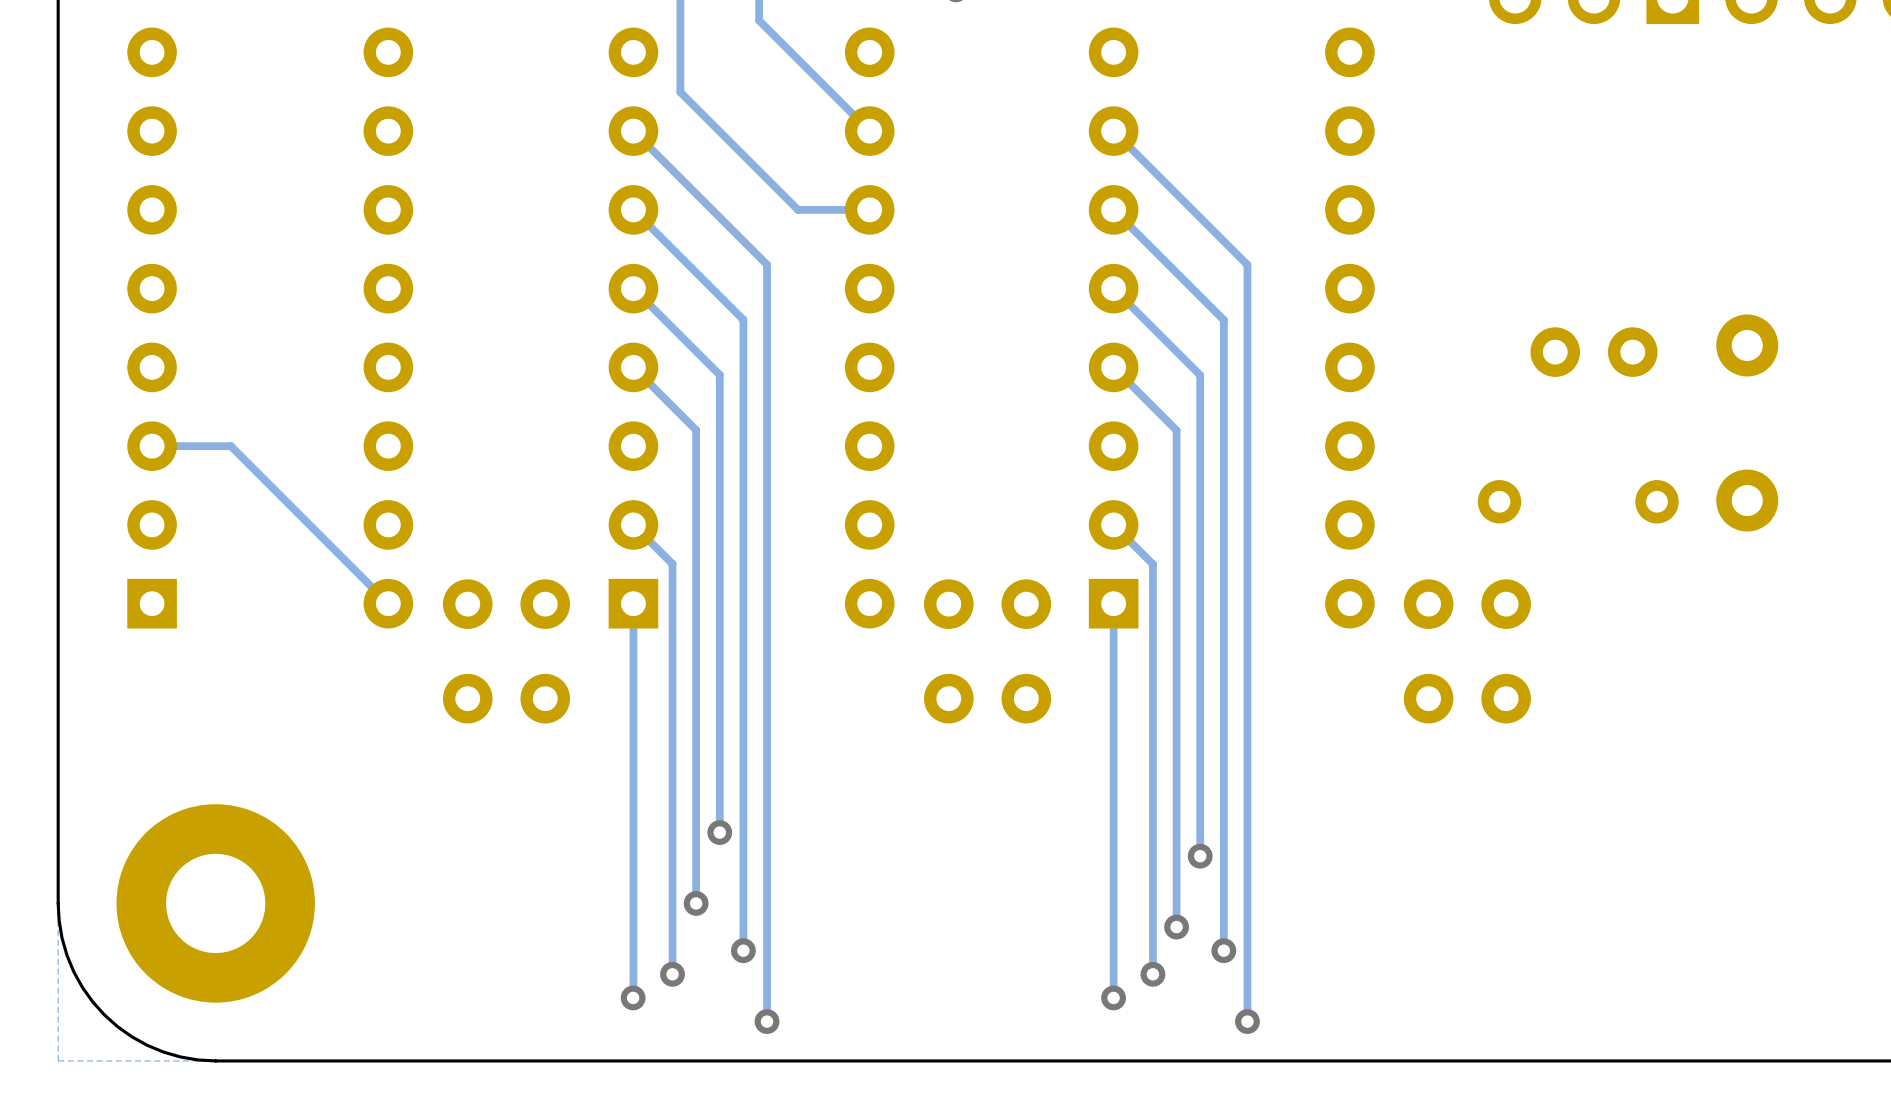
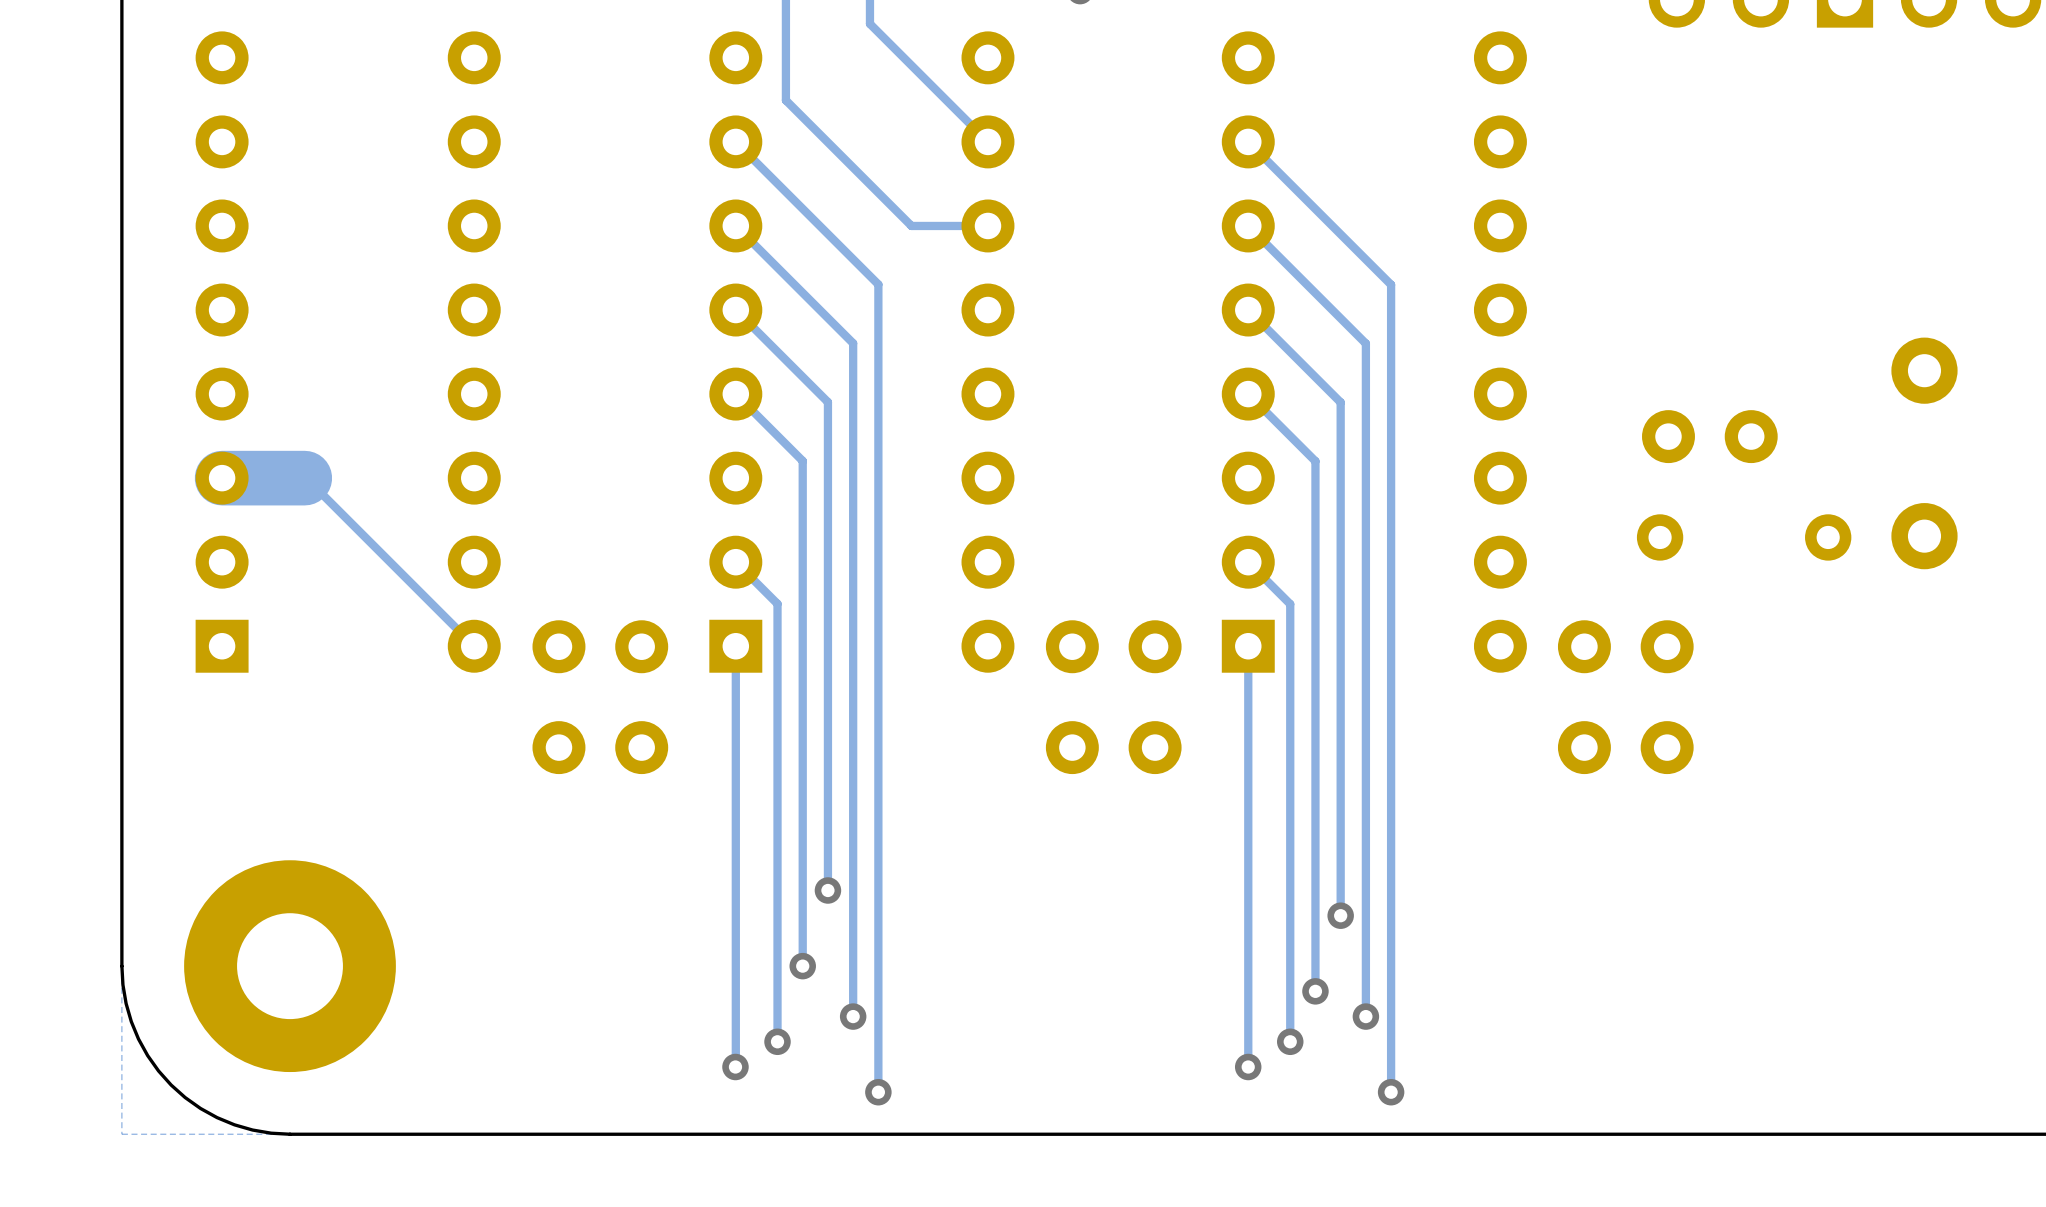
part position: (1594, 352) -> (1709, 436)
track width: thin (229, 446) (152, 446) -> thick (304, 478) (222, 478)

